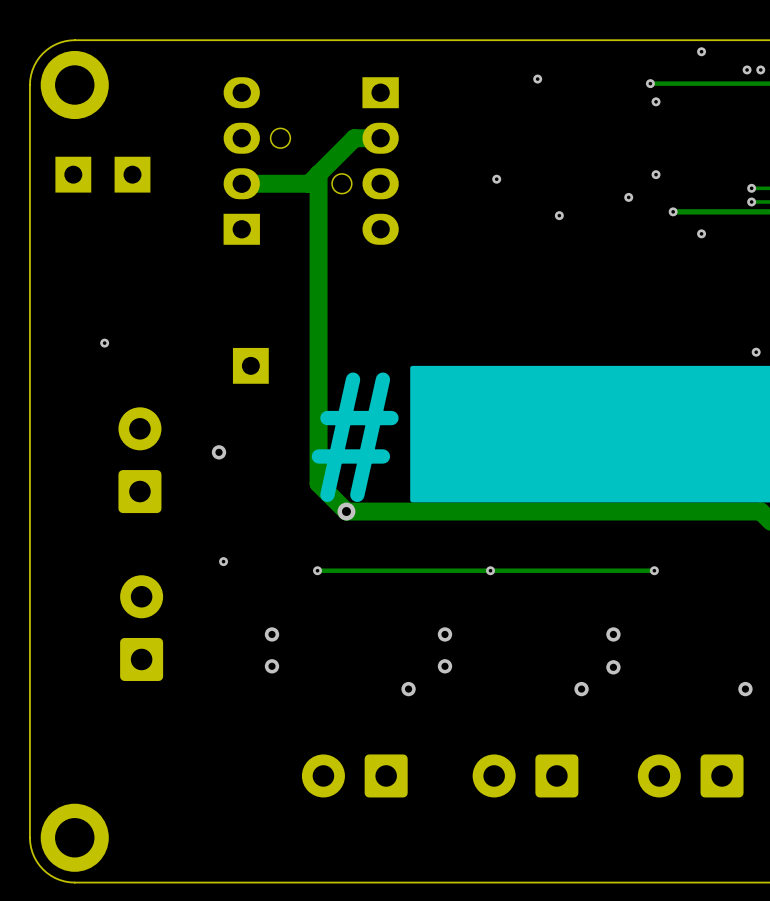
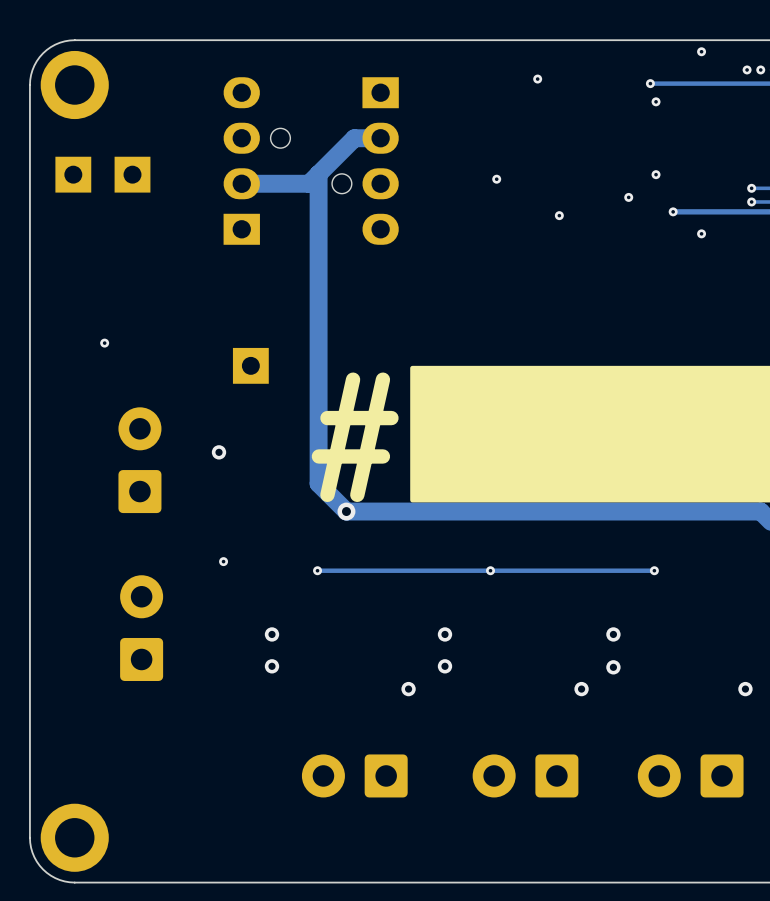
via: (756, 352) -> none

